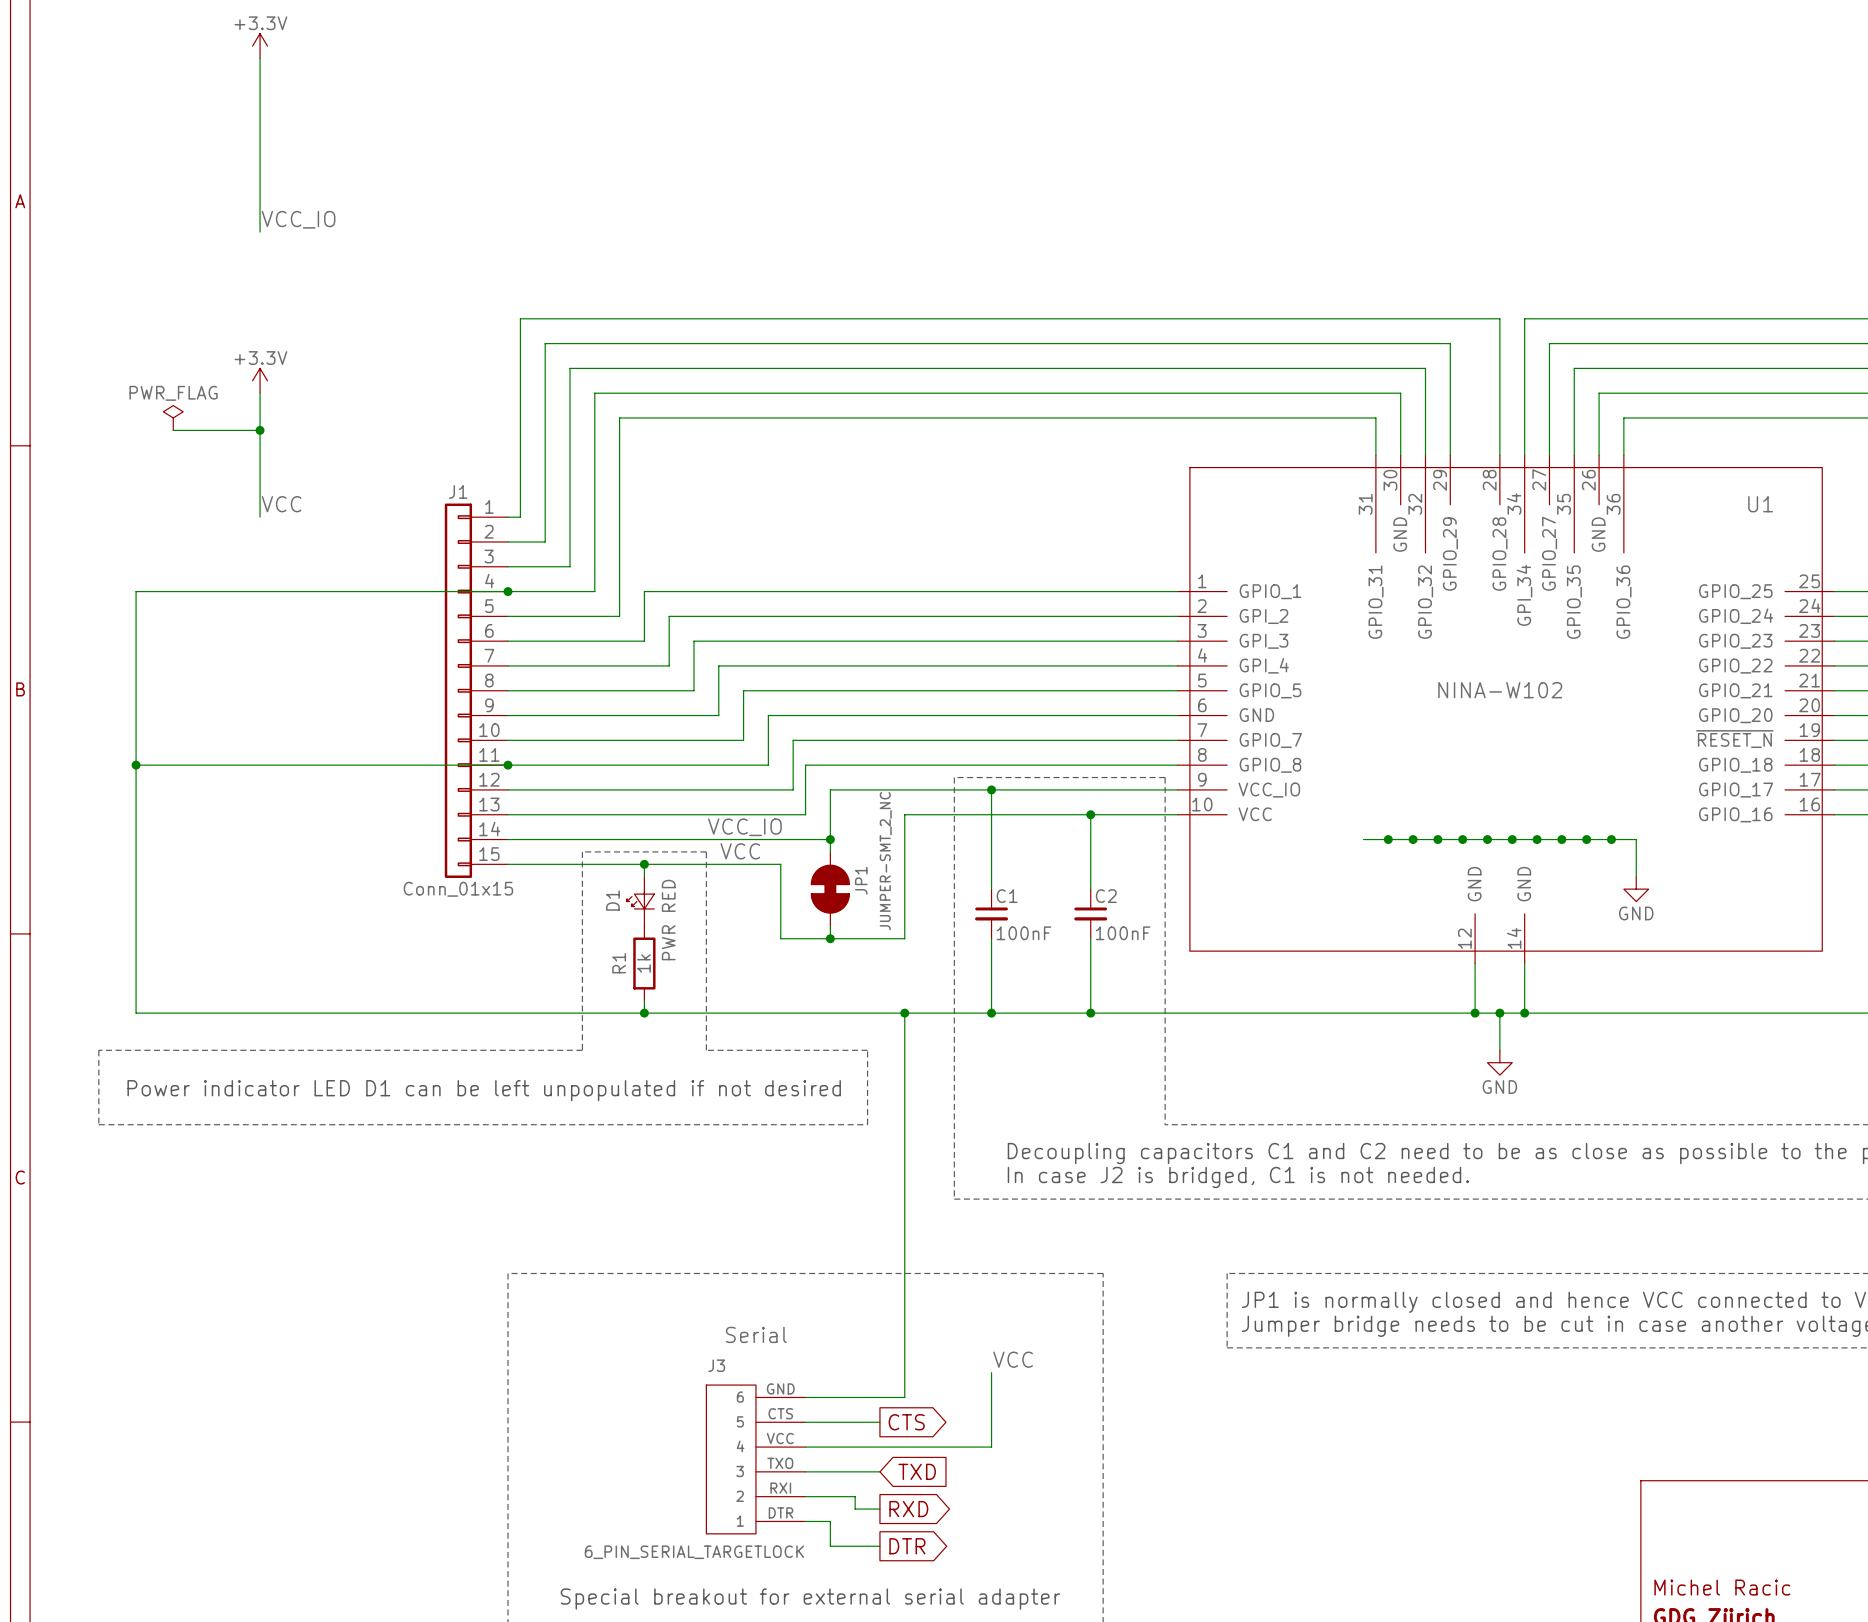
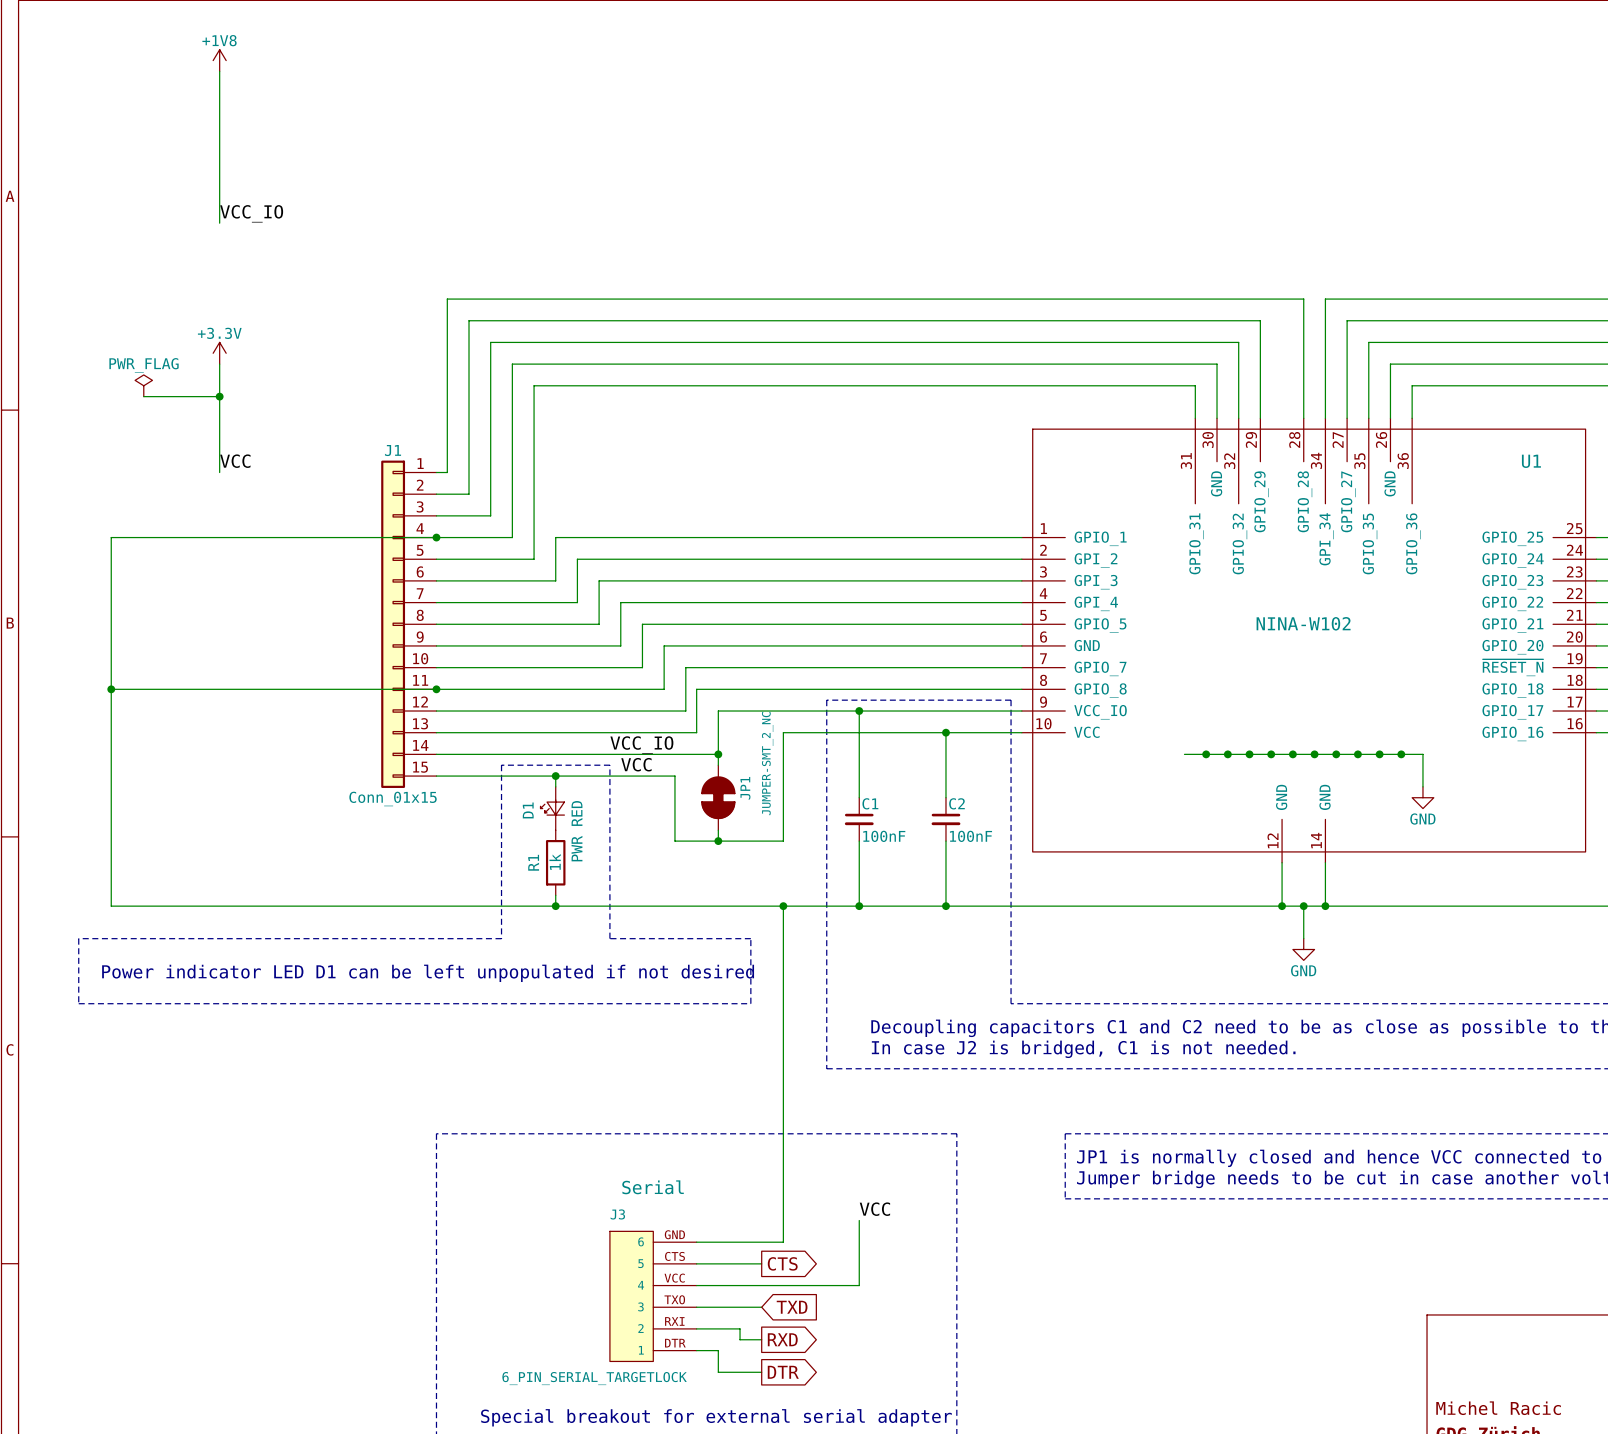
power symbol: +3.3V (260, 46) -> +1V8 (219, 60)

